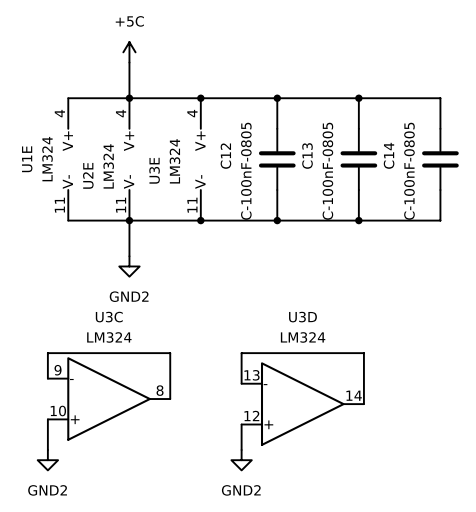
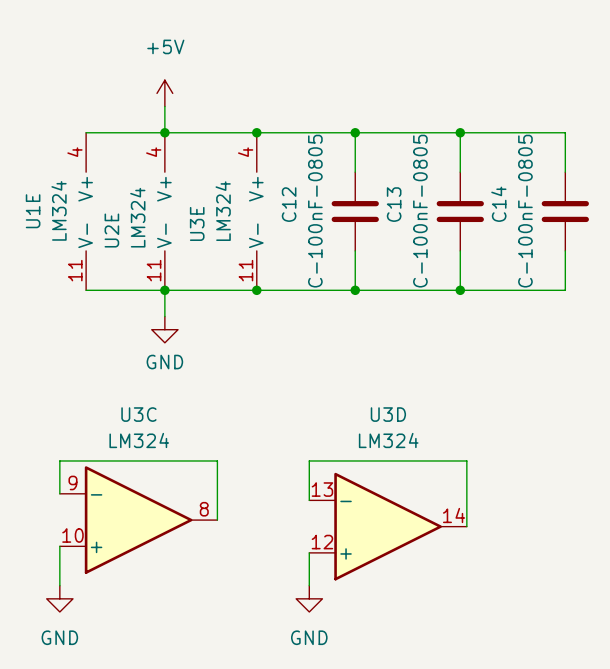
power symbol: +5C (129, 52) -> none
power symbol: none -> +5V (164, 93)
power symbol: none -> GND (164, 329)
power symbol: GND2 (129, 266) -> none
power symbol: GND2 (47, 460) -> GND (59, 598)
power symbol: GND2 (241, 460) -> GND (309, 598)

